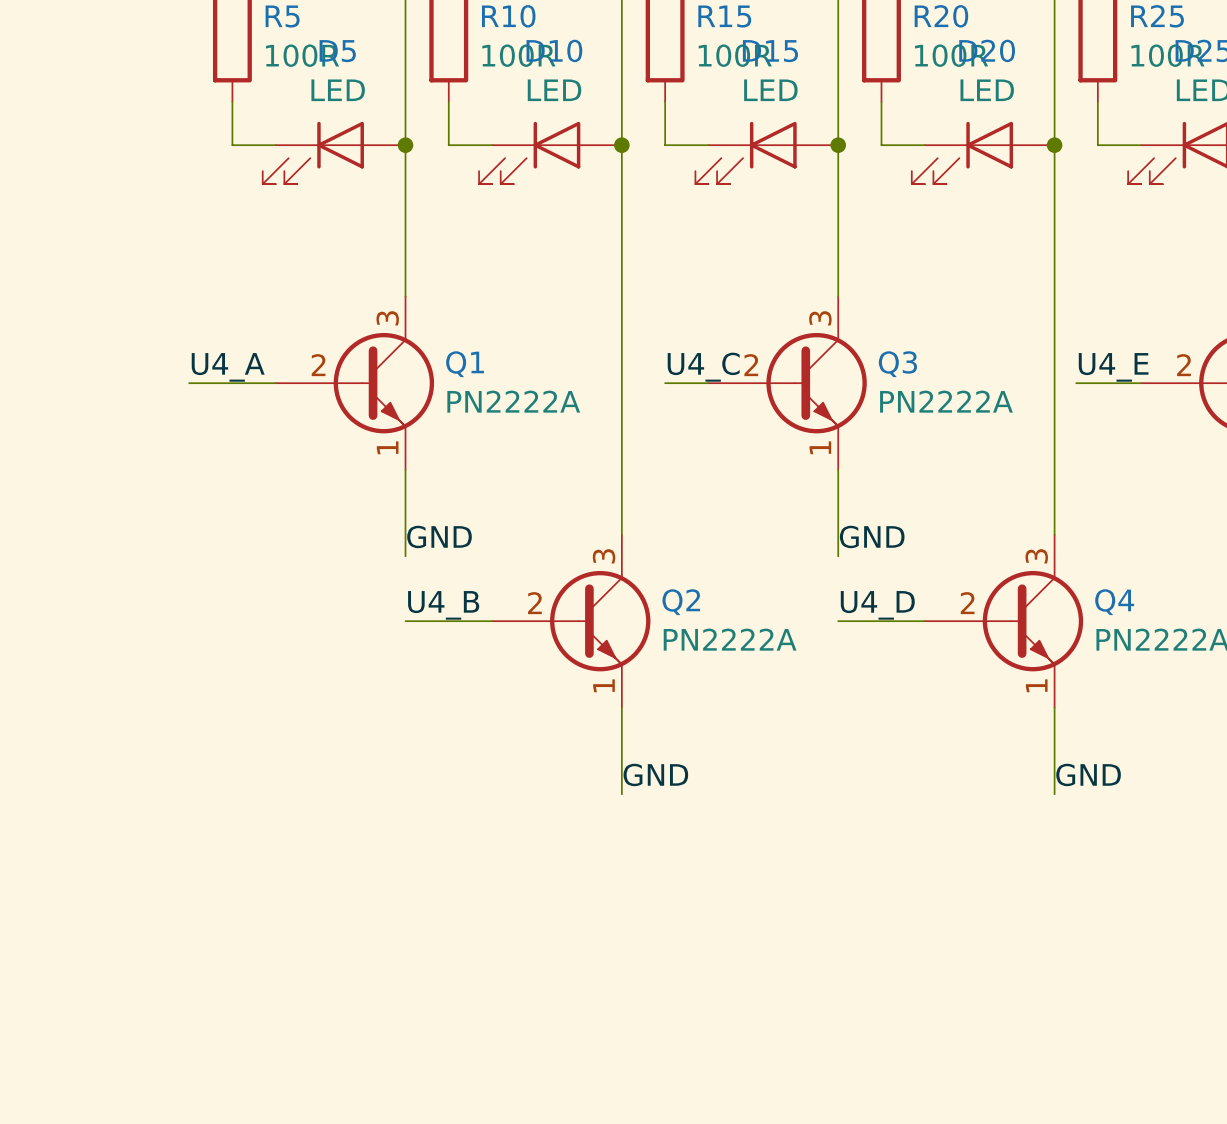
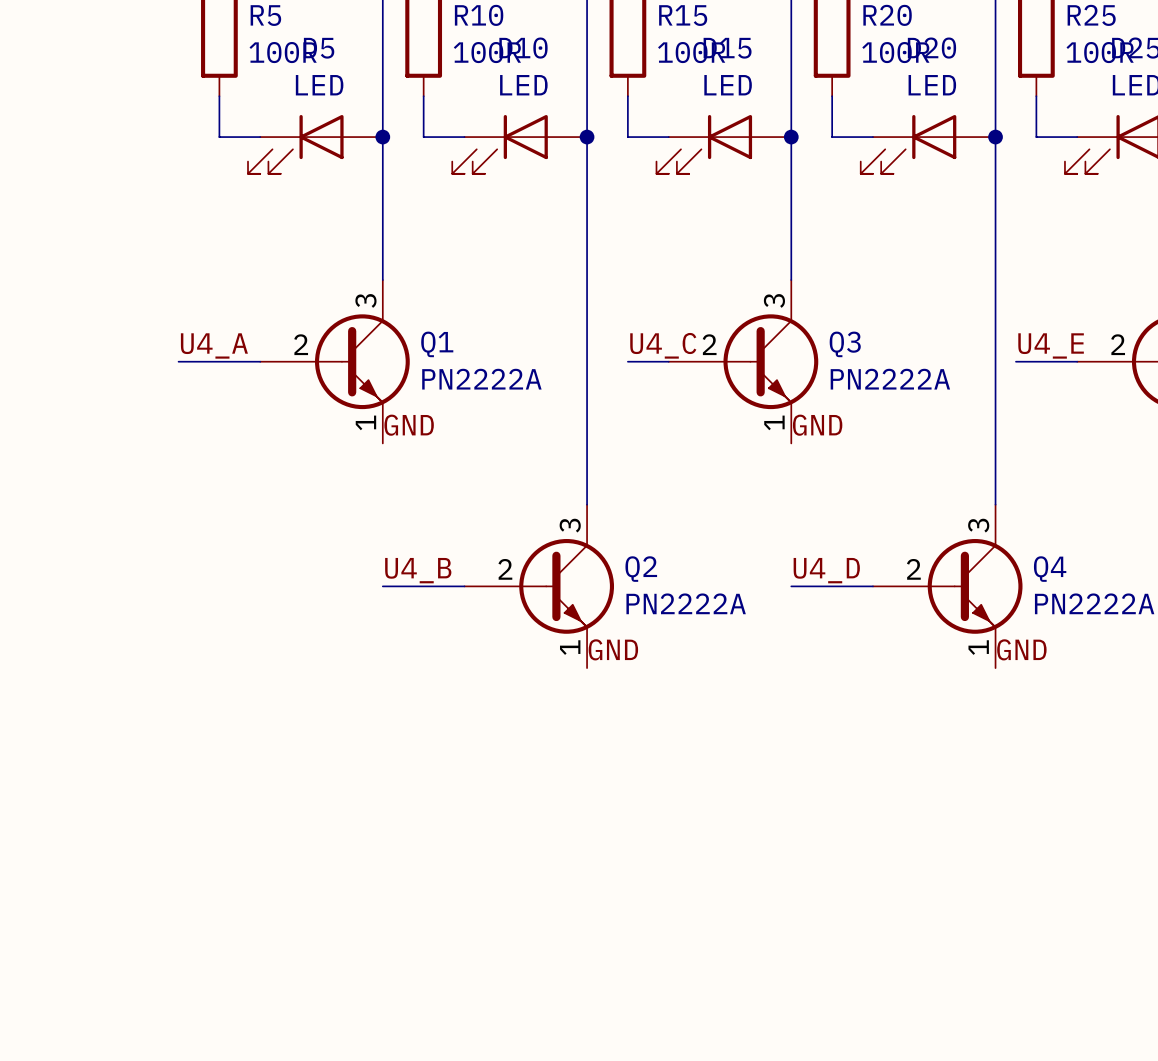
wire: (405, 469) (405, 556) -> none
wire: (838, 469) (838, 556) -> none
label position: GND (439, 536) -> GND (409, 425)
label position: GND (872, 536) -> GND (817, 425)
wire: (621, 707) (621, 794) -> none
wire: (1054, 707) (1054, 794) -> none
label position: GND (655, 774) -> GND (613, 649)
label position: GND (1088, 774) -> GND (1021, 649)

